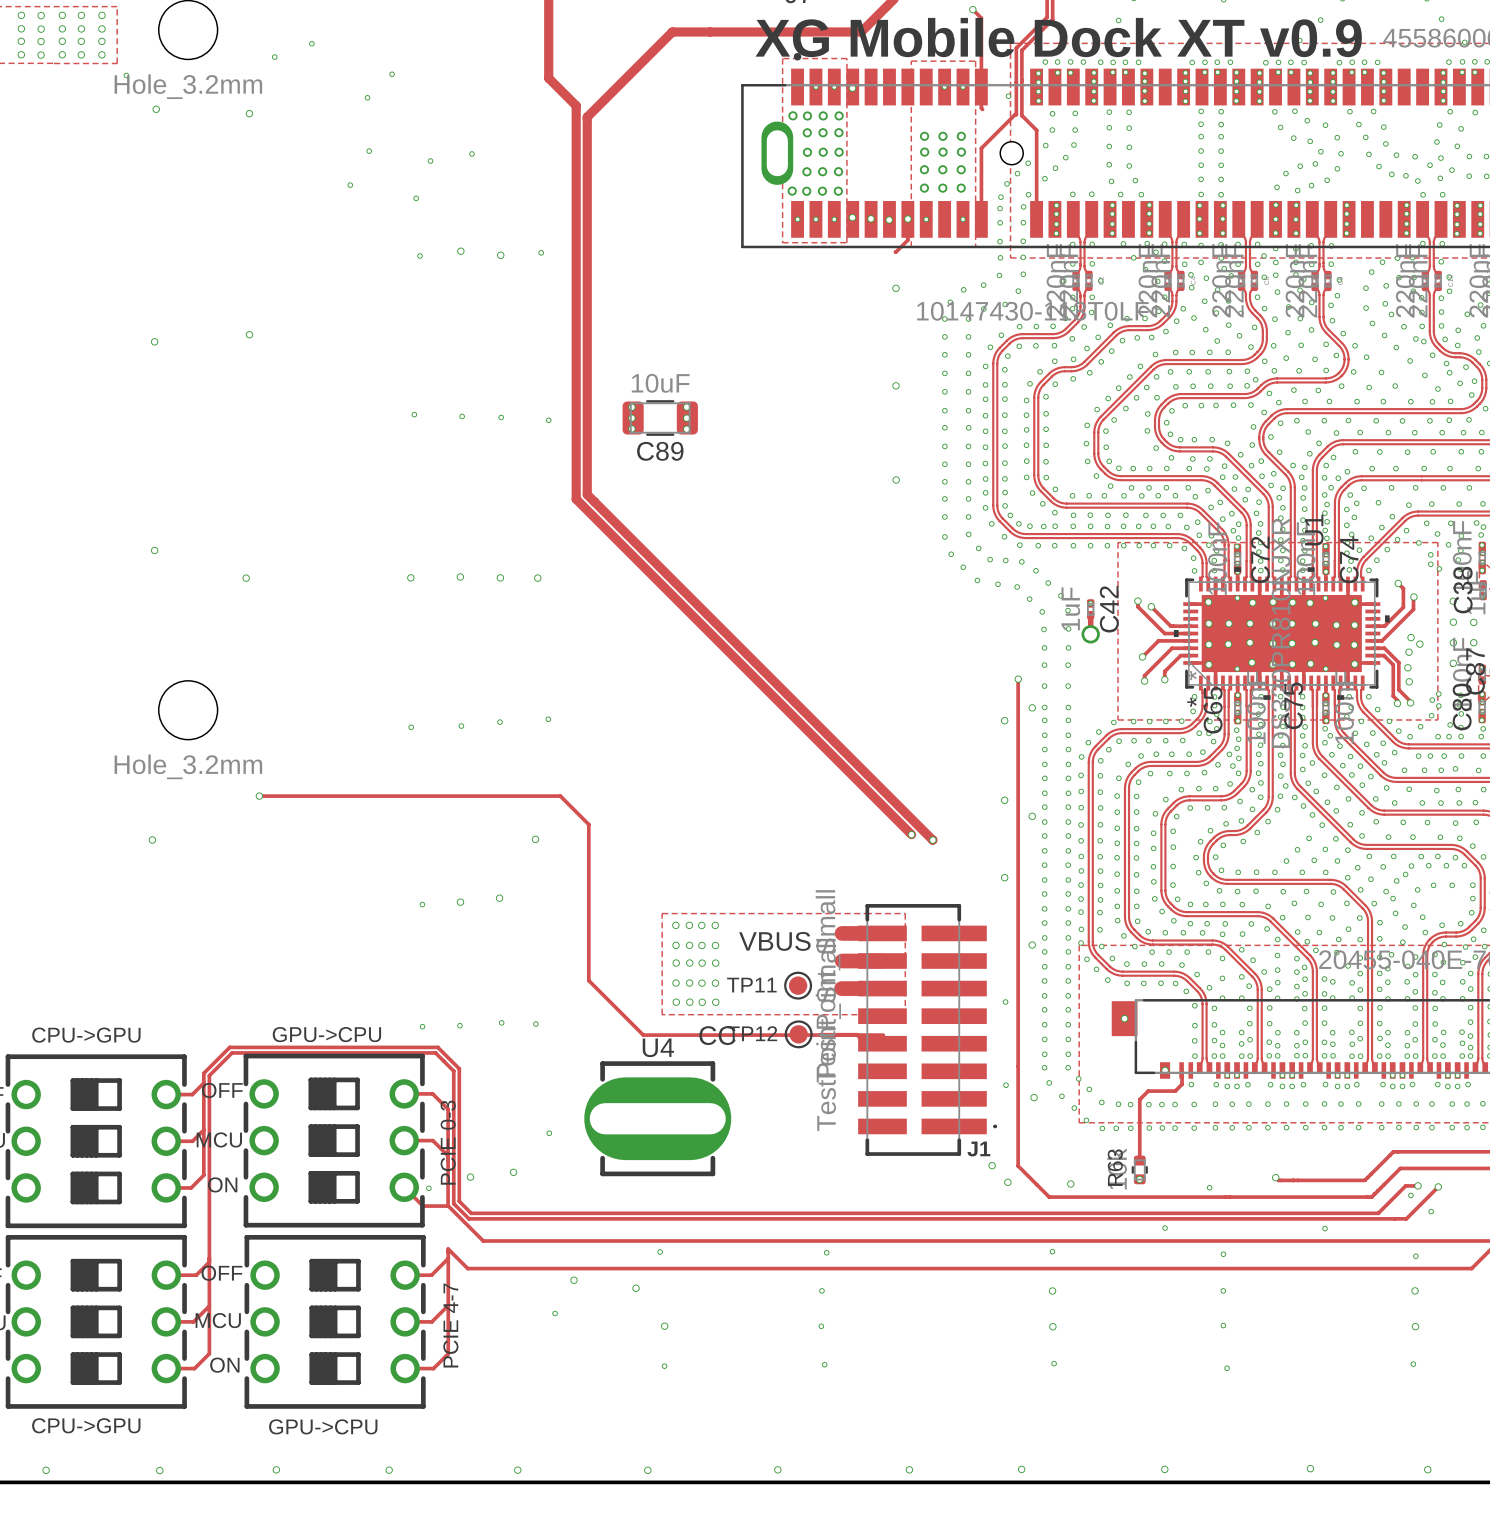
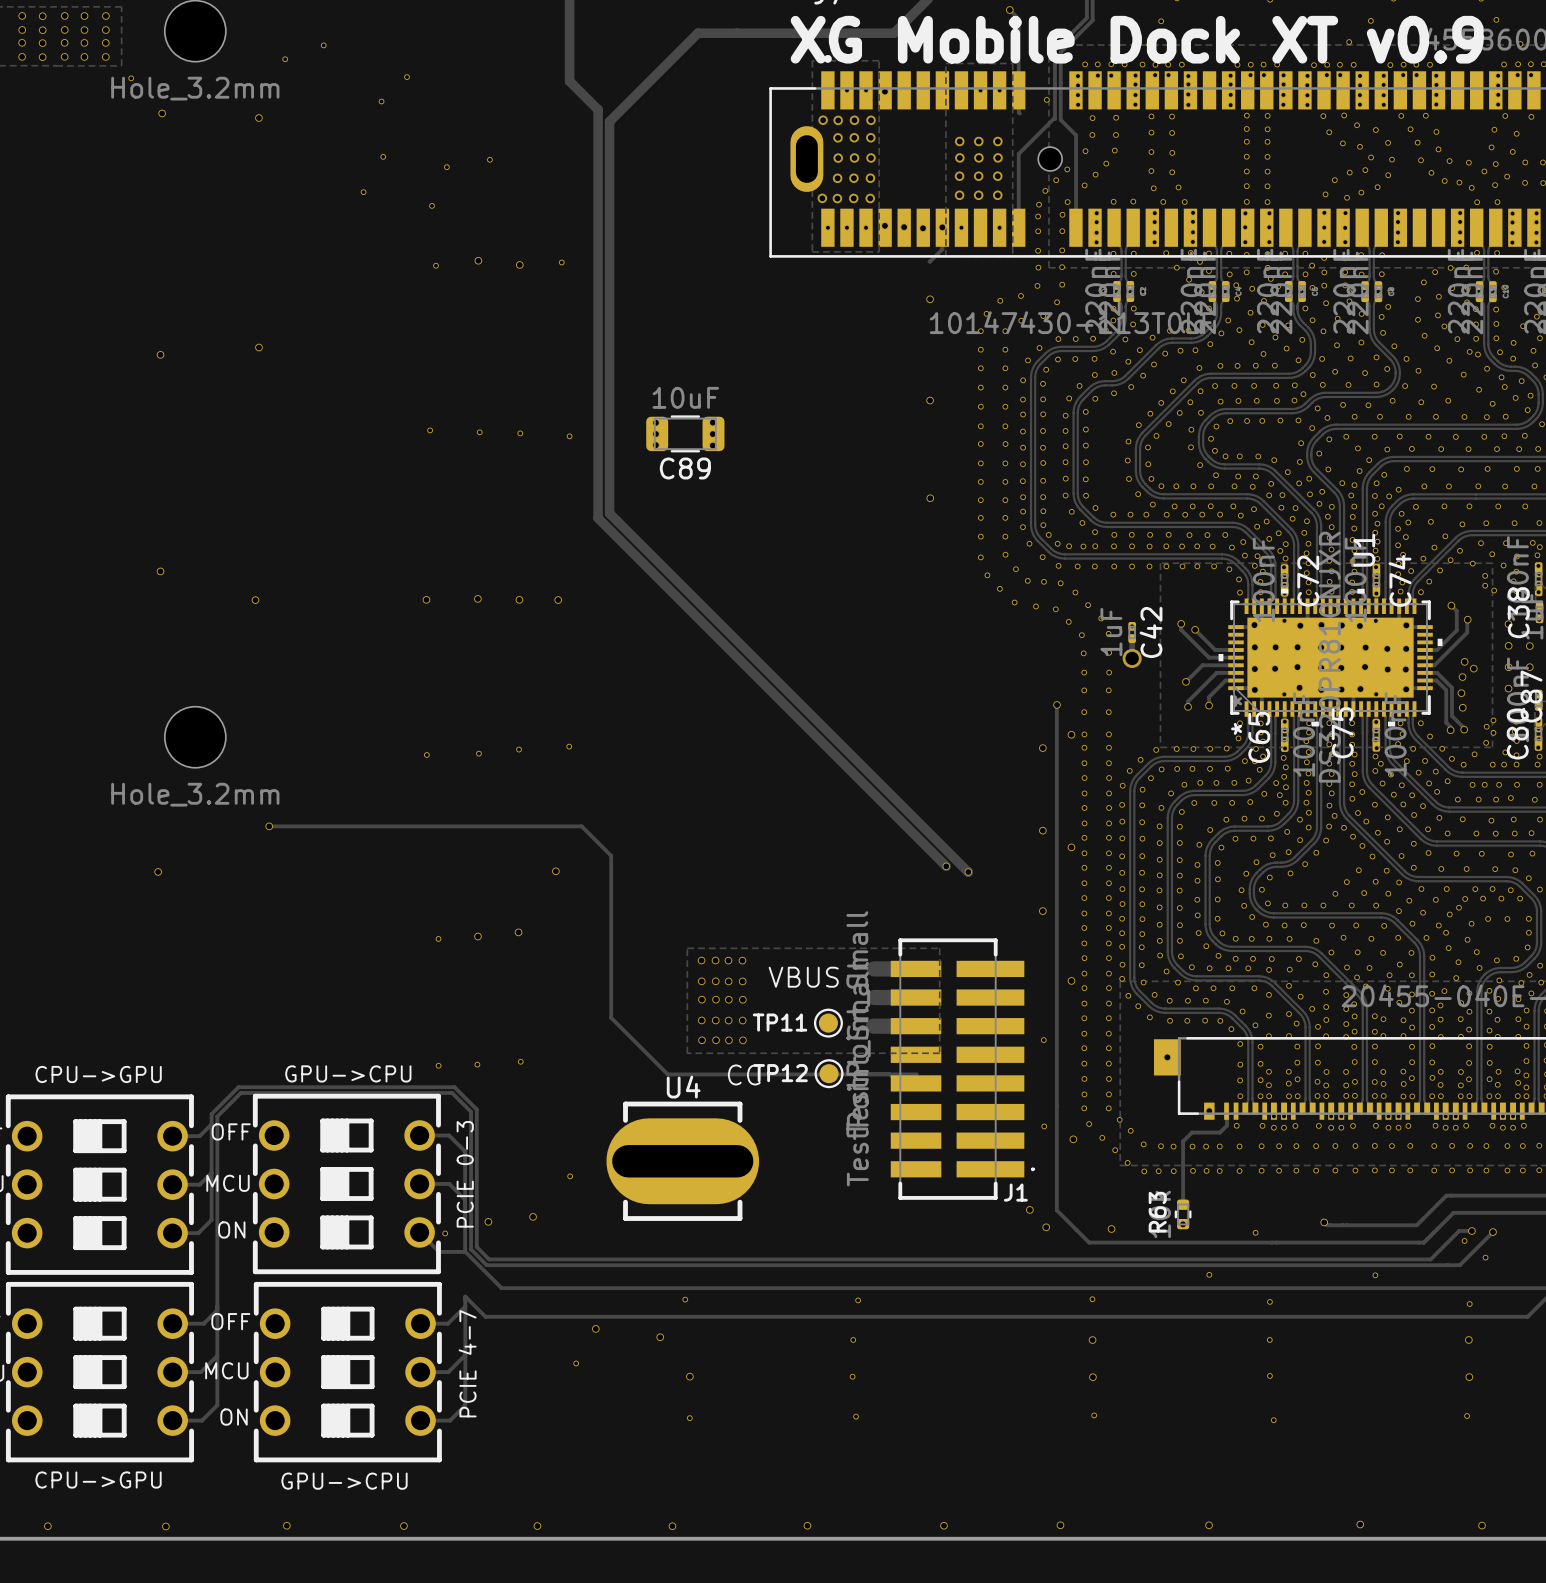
via: (1449, 291) -> none
via: (535, 1024) -> none

